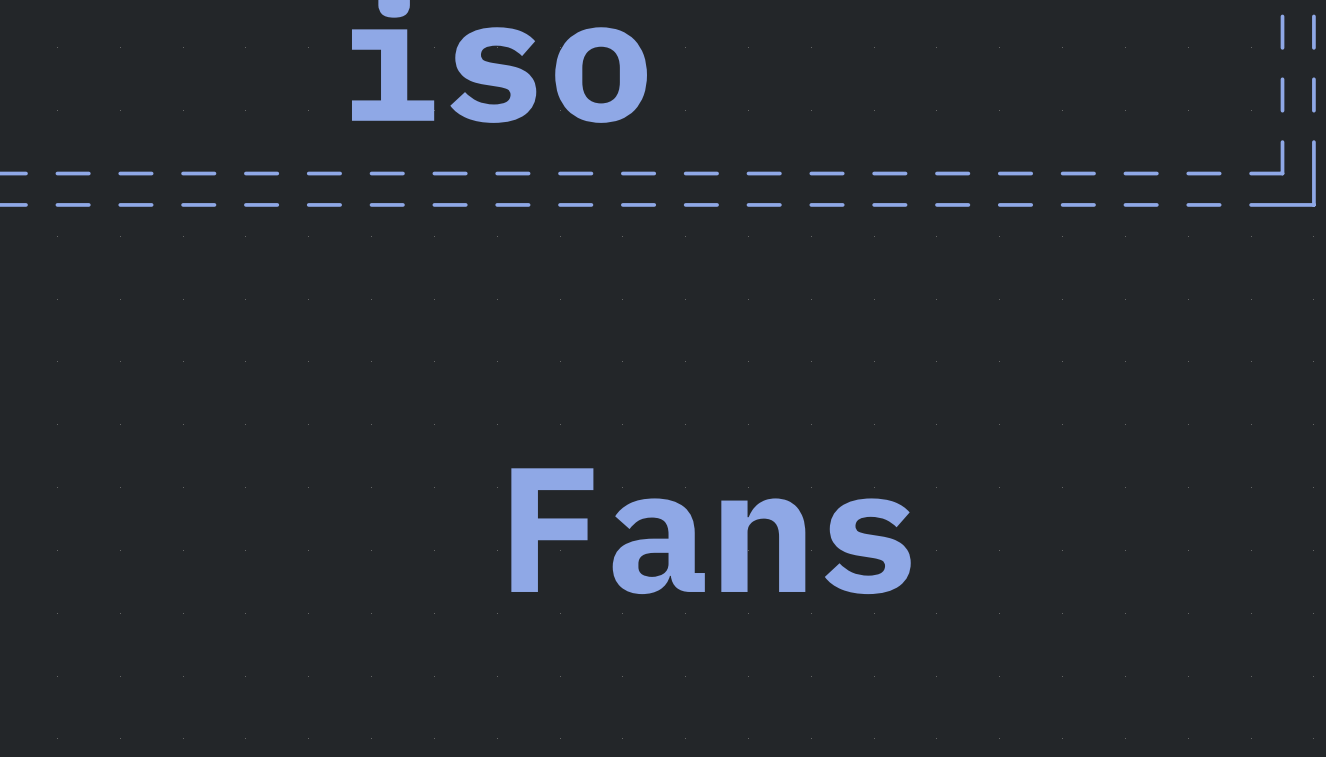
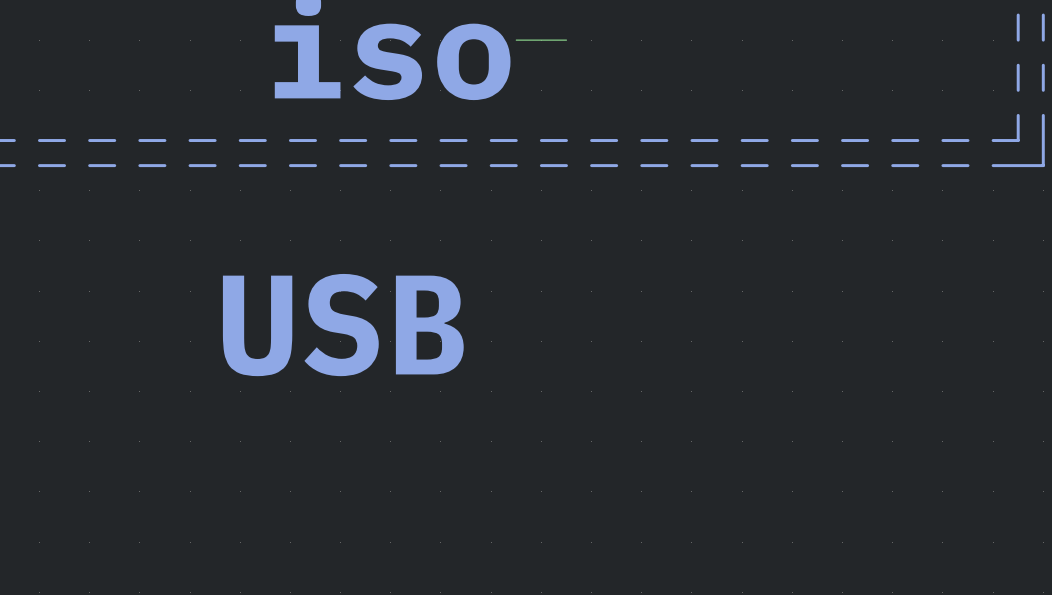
wire: none -> (516, 40) (566, 40)
text: none -> USB (343, 325)
text: Fans (711, 531) -> none

